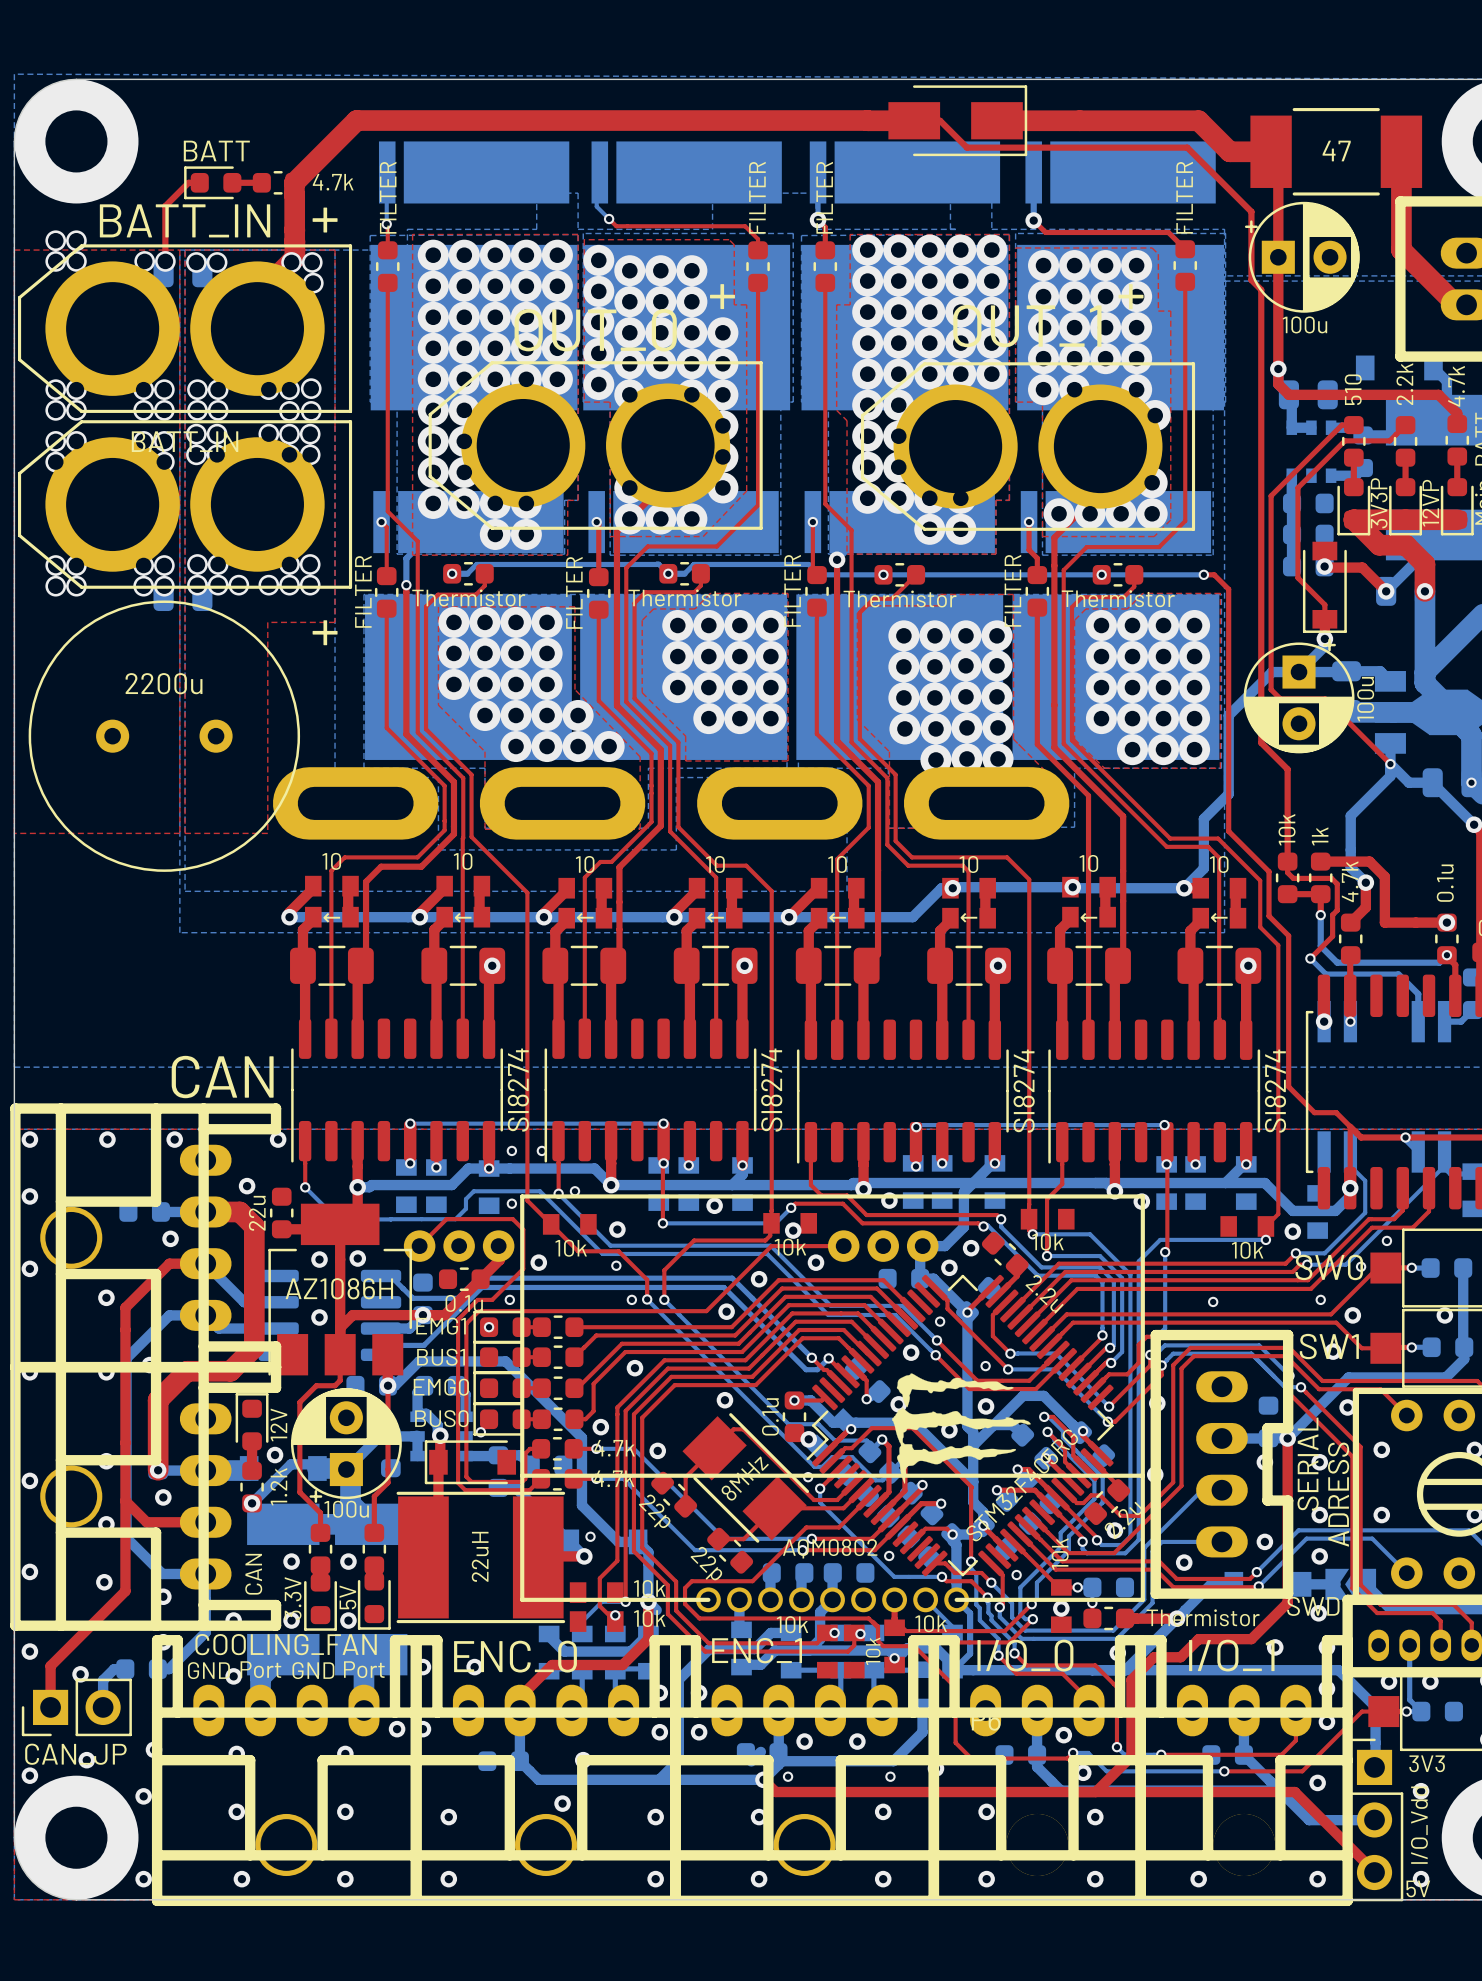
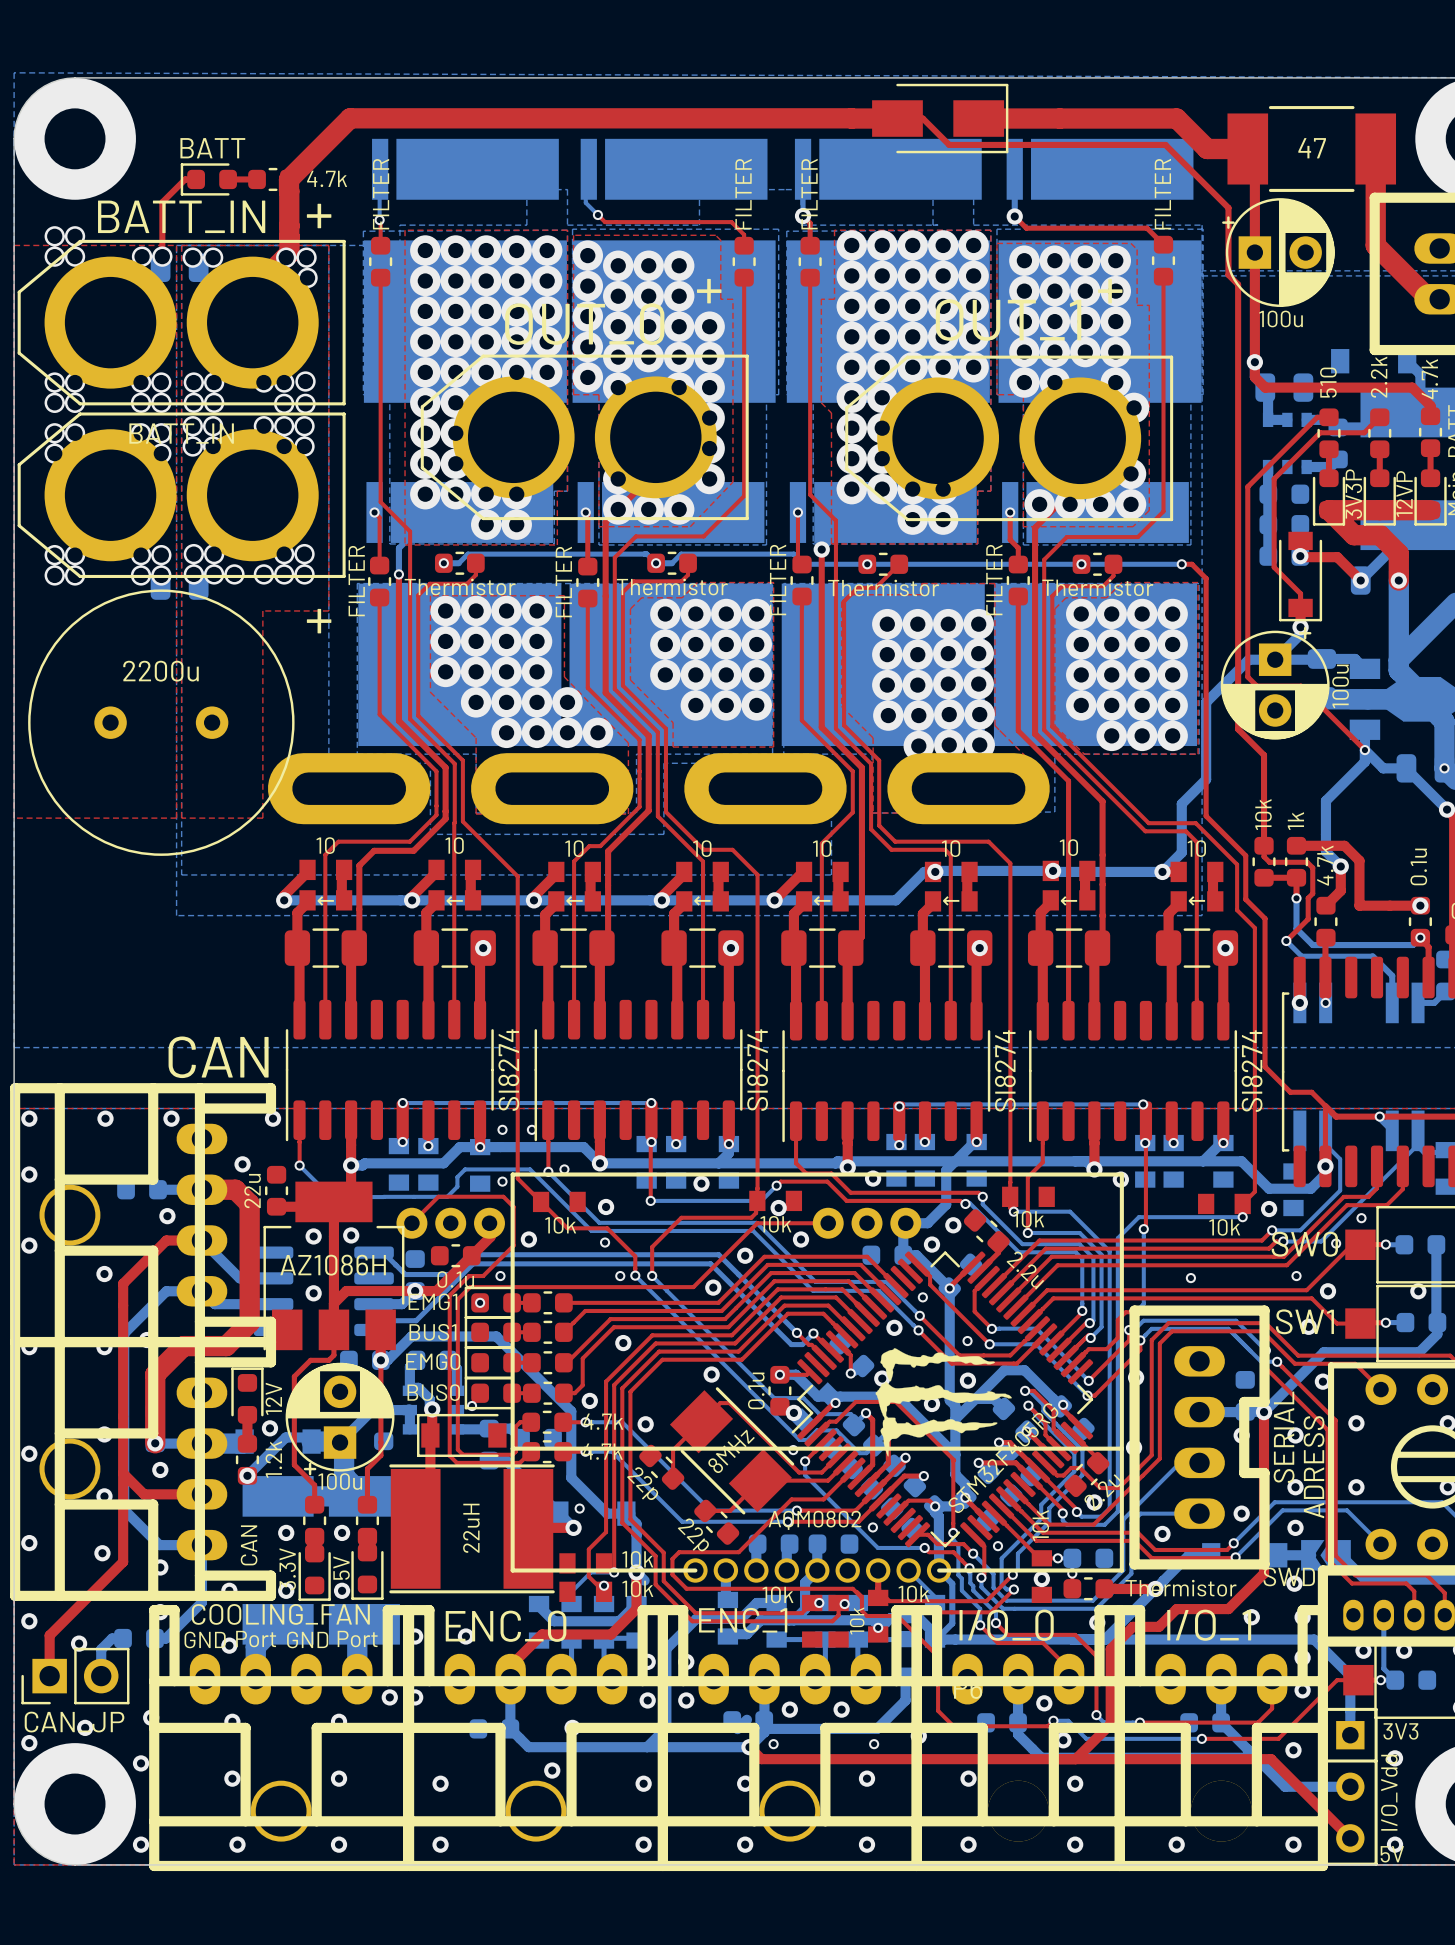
part footprint: [1345, 1738, 1404, 1902] -> [1323, 1707, 1378, 1866]

